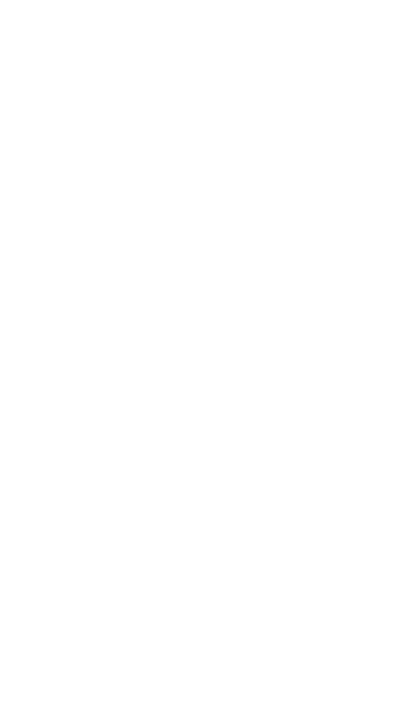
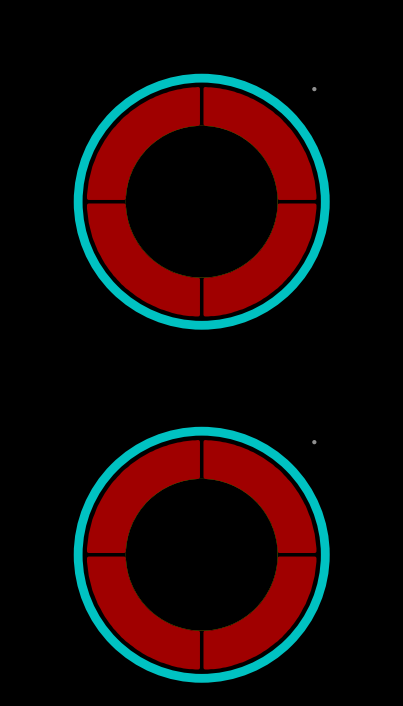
part: none -> (201, 201)
part: none -> (201, 554)

